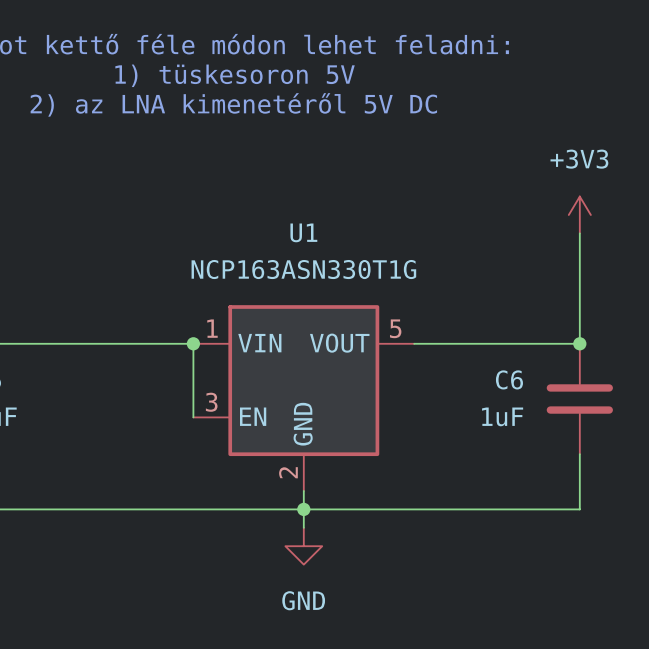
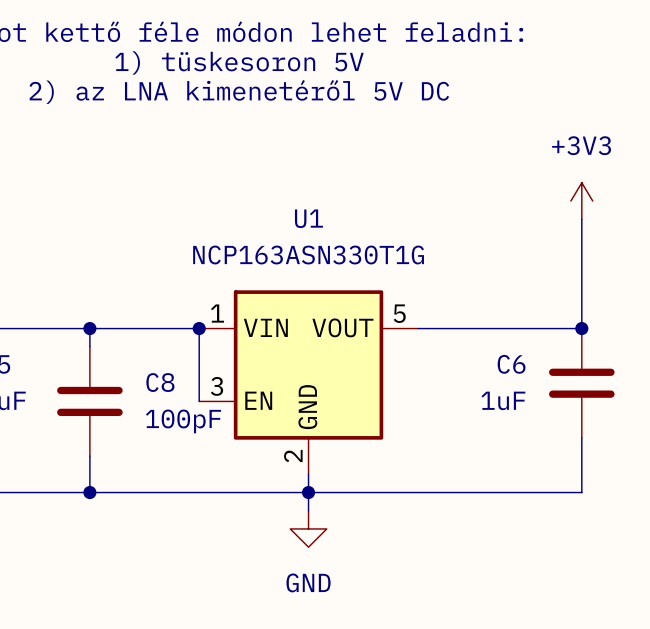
wire: none -> (89, 328) (89, 346)
junction: none -> (89, 328)
C8: none -> 100pF (89, 401)
wire: none -> (89, 456) (89, 492)
junction: none -> (89, 492)

